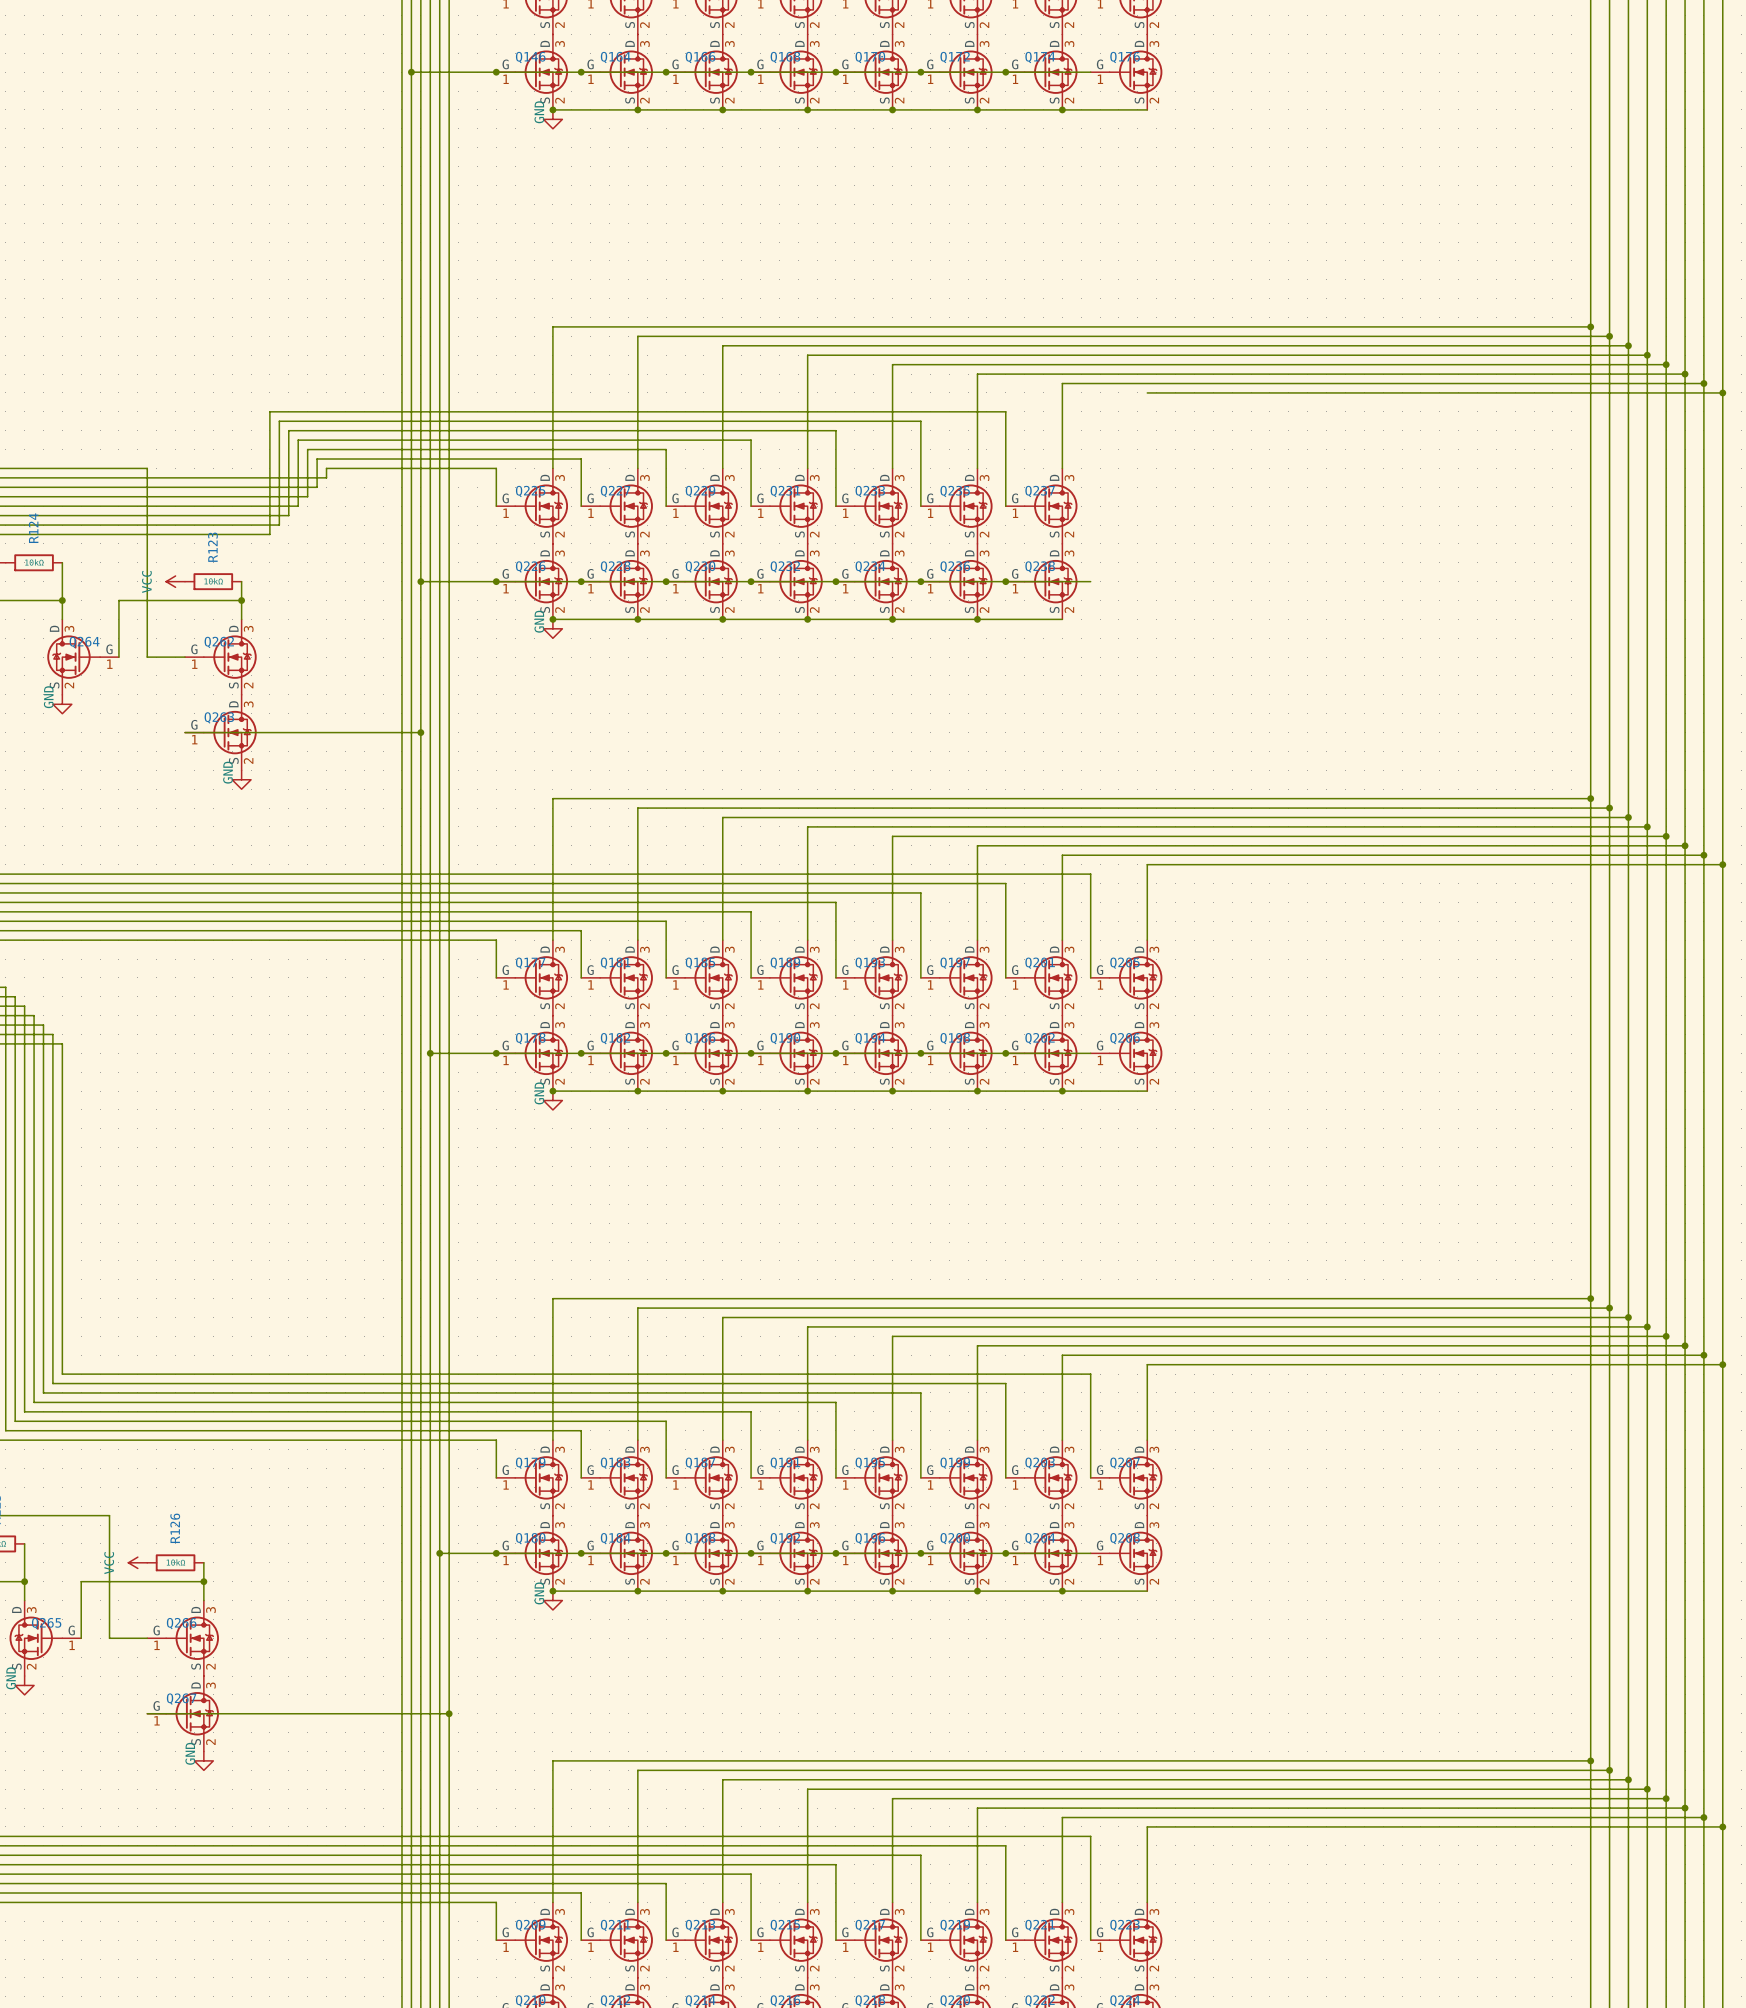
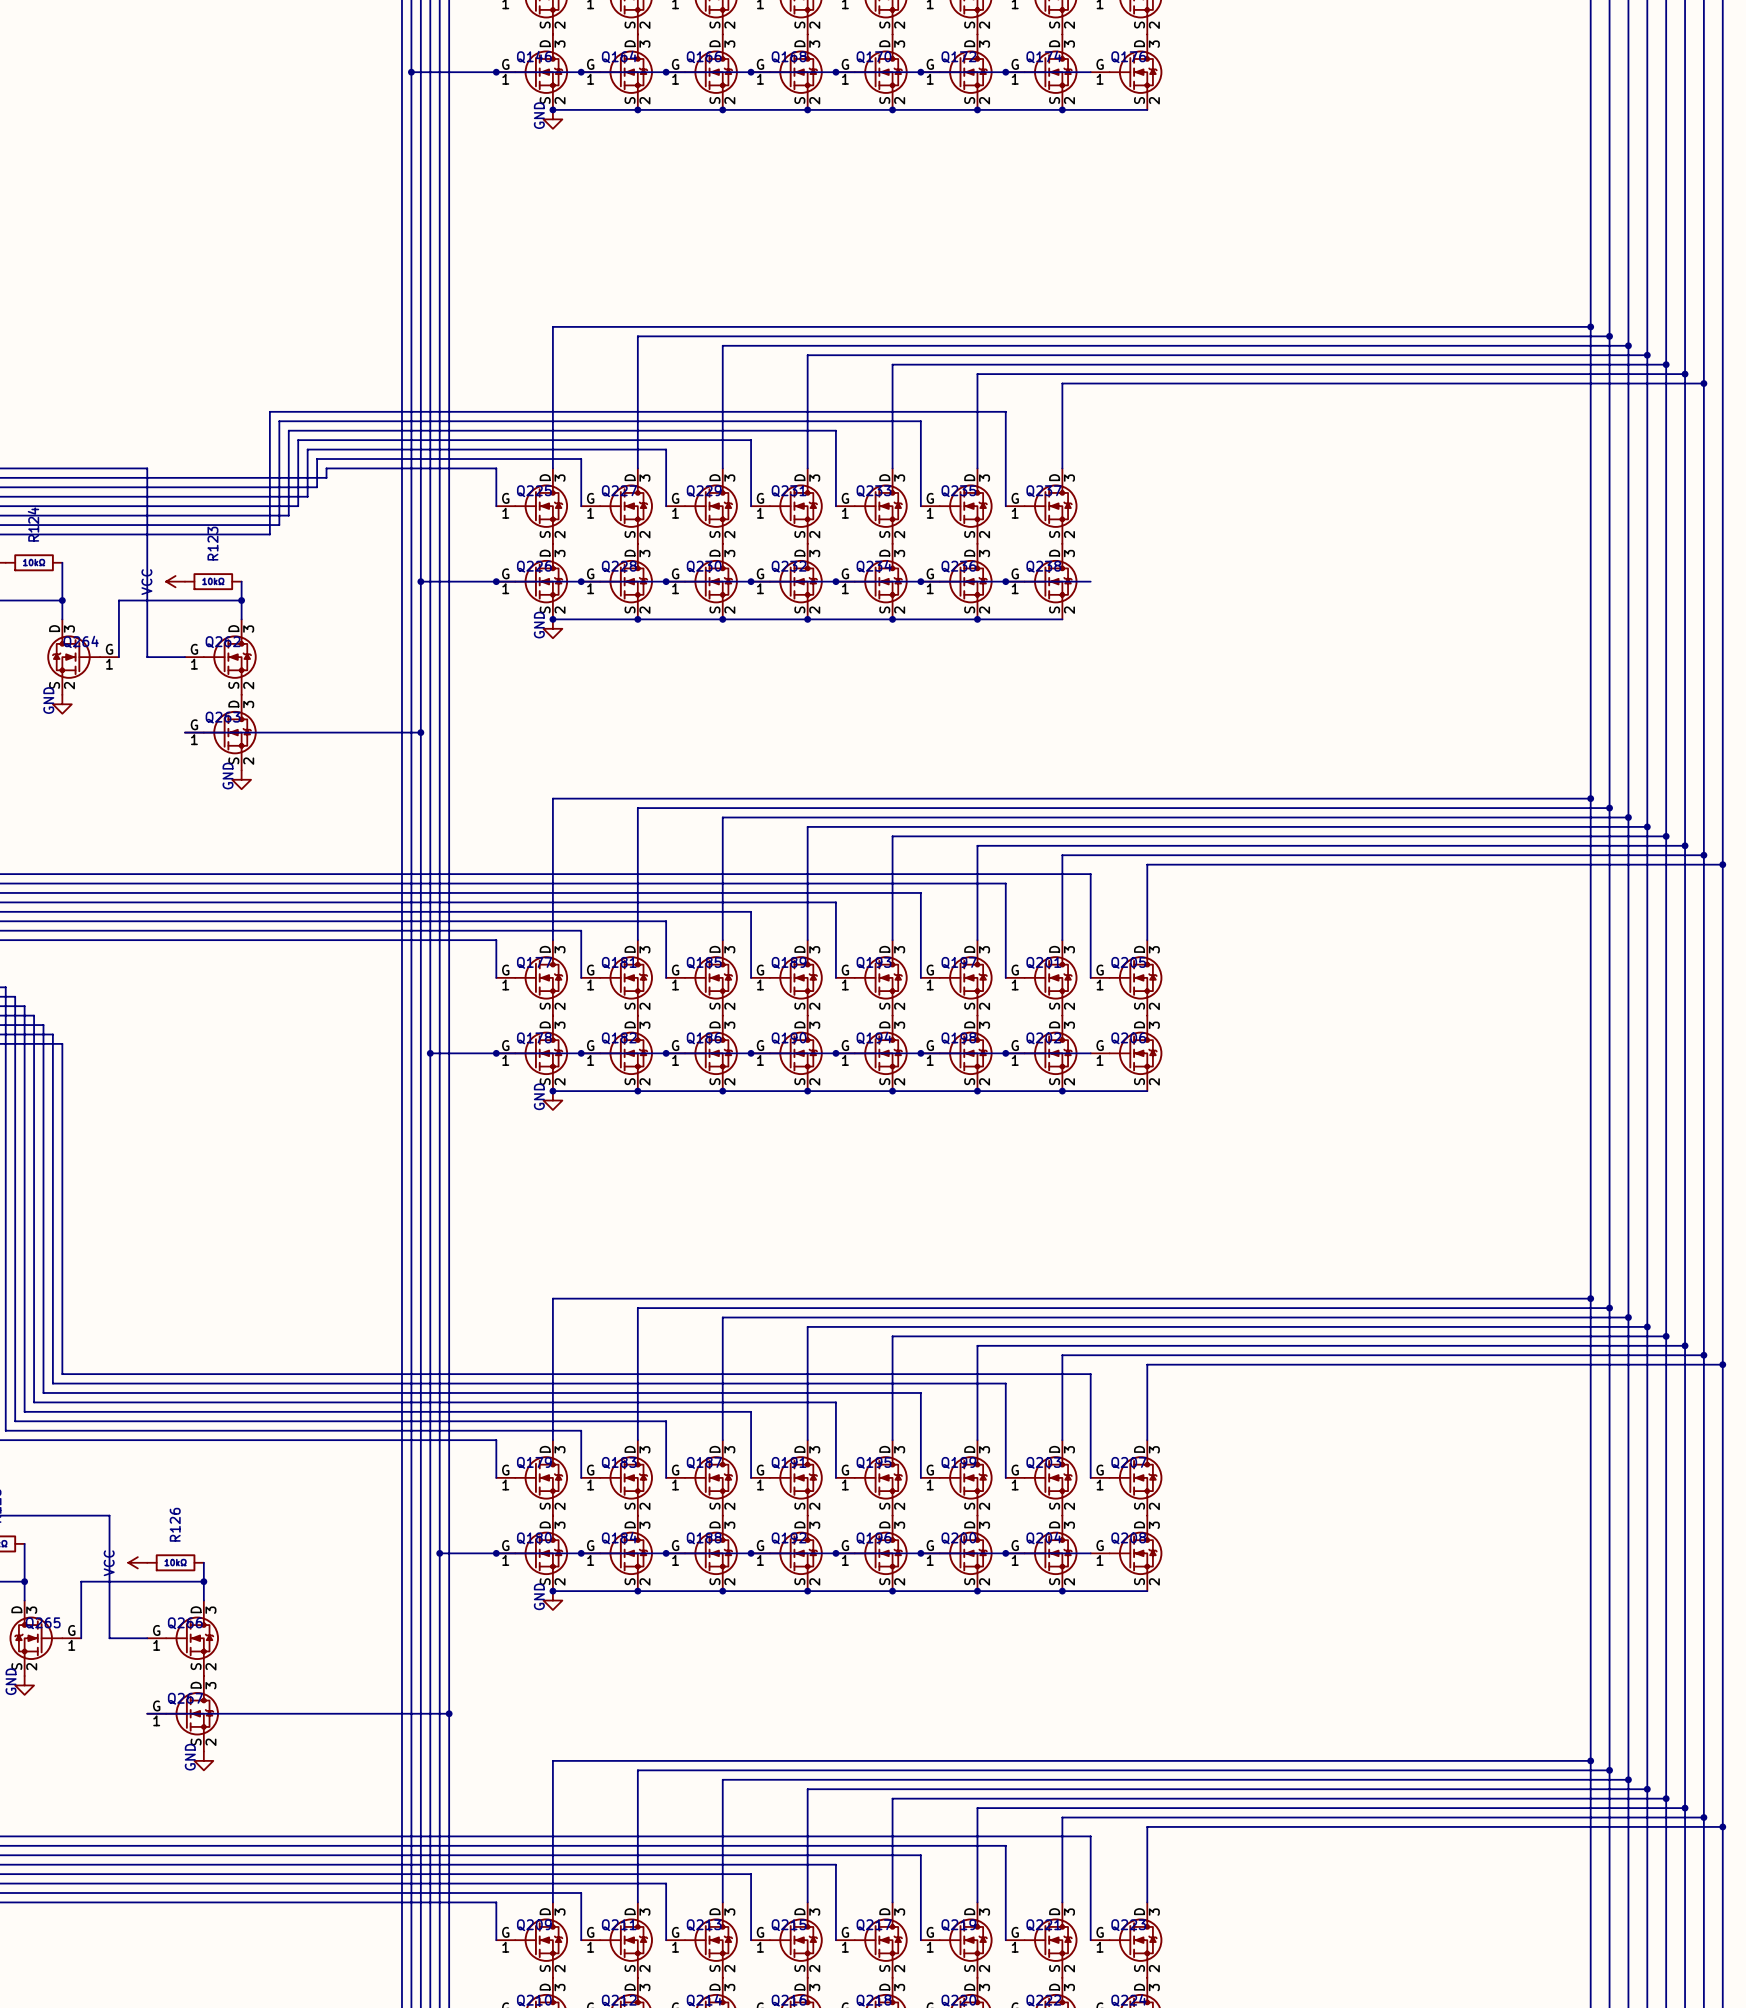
wire: (1147, 392) (1722, 392) -> none
junction: (1722, 392) -> none

